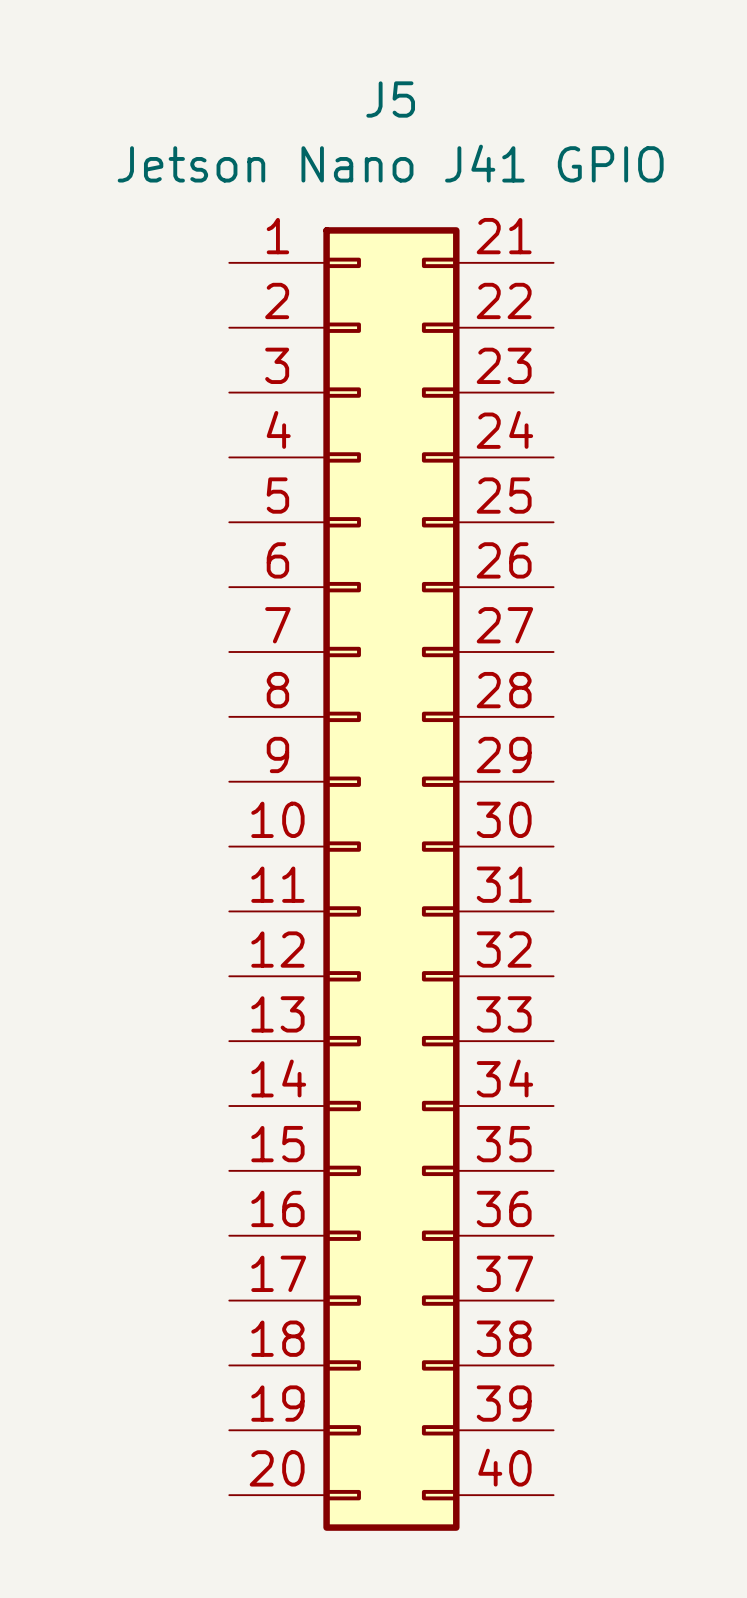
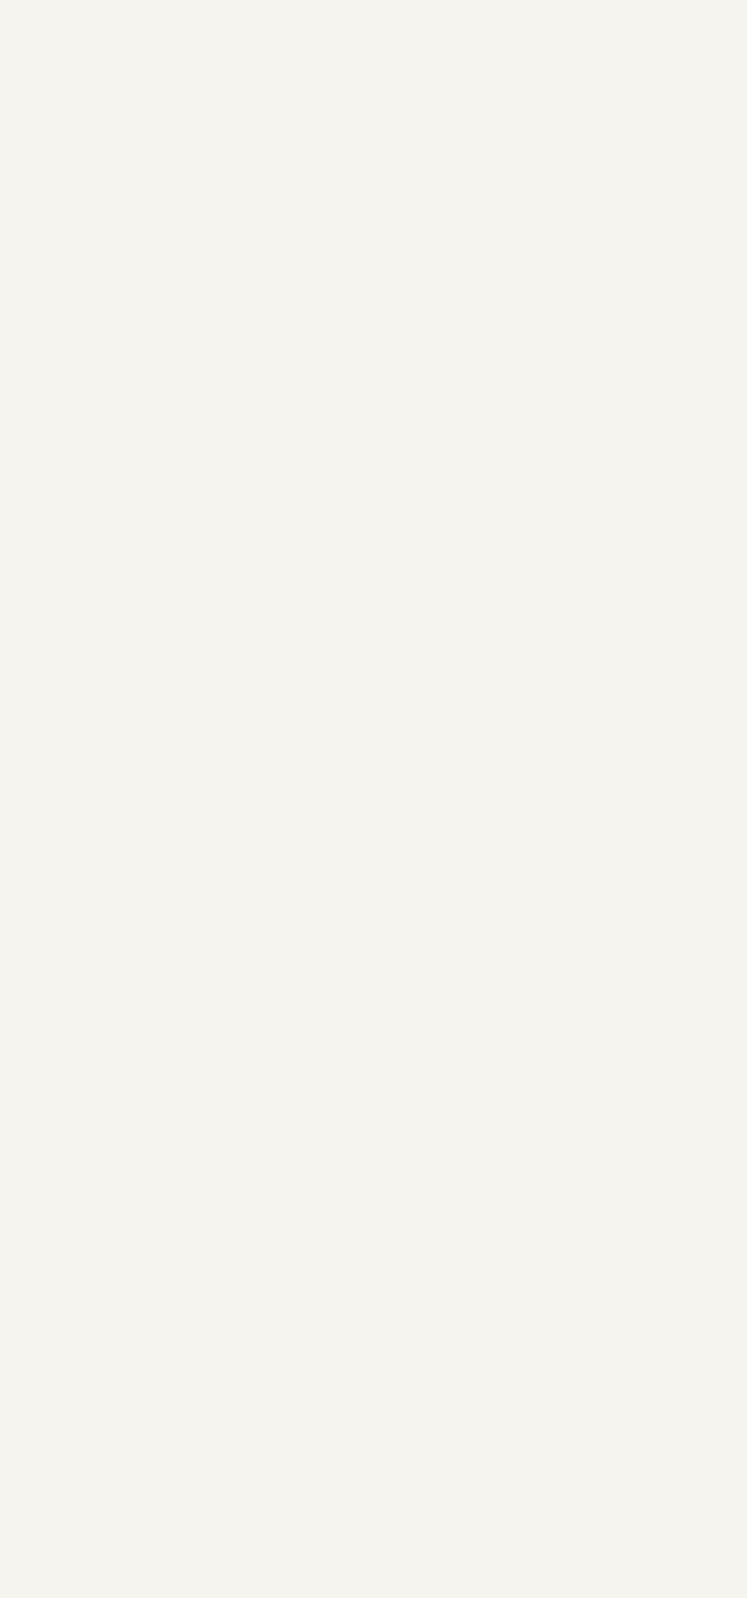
J5: Jetson Nano J41 GPIO (391, 879) -> none

